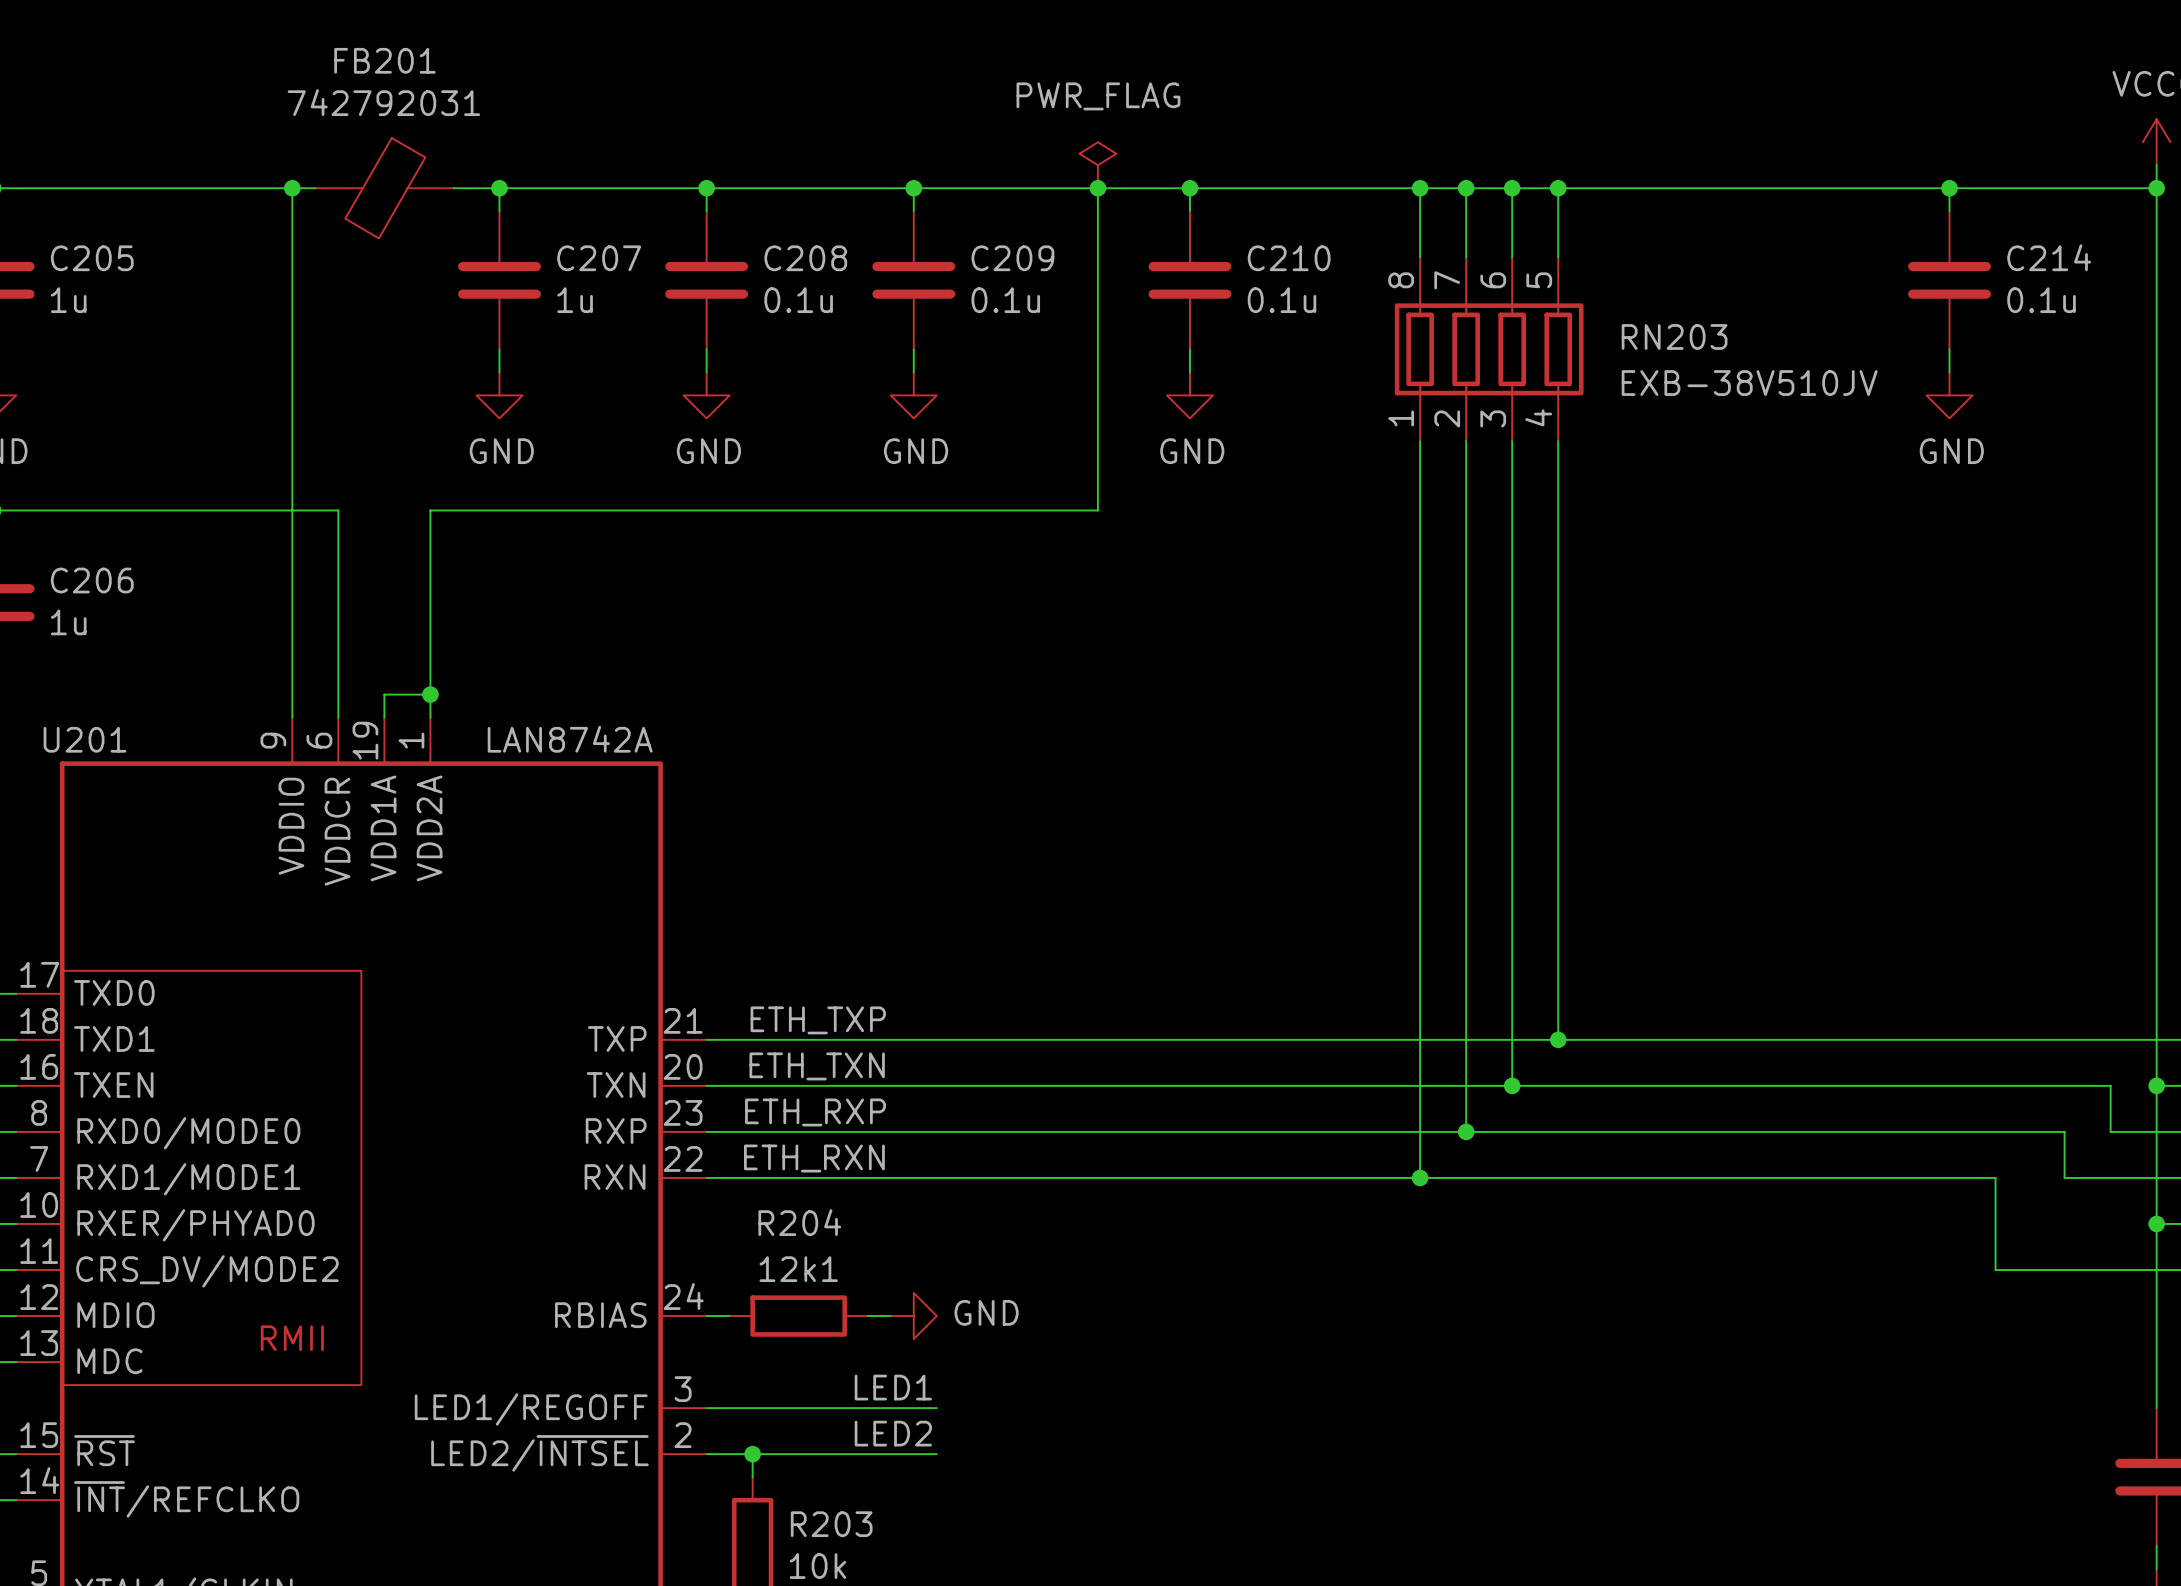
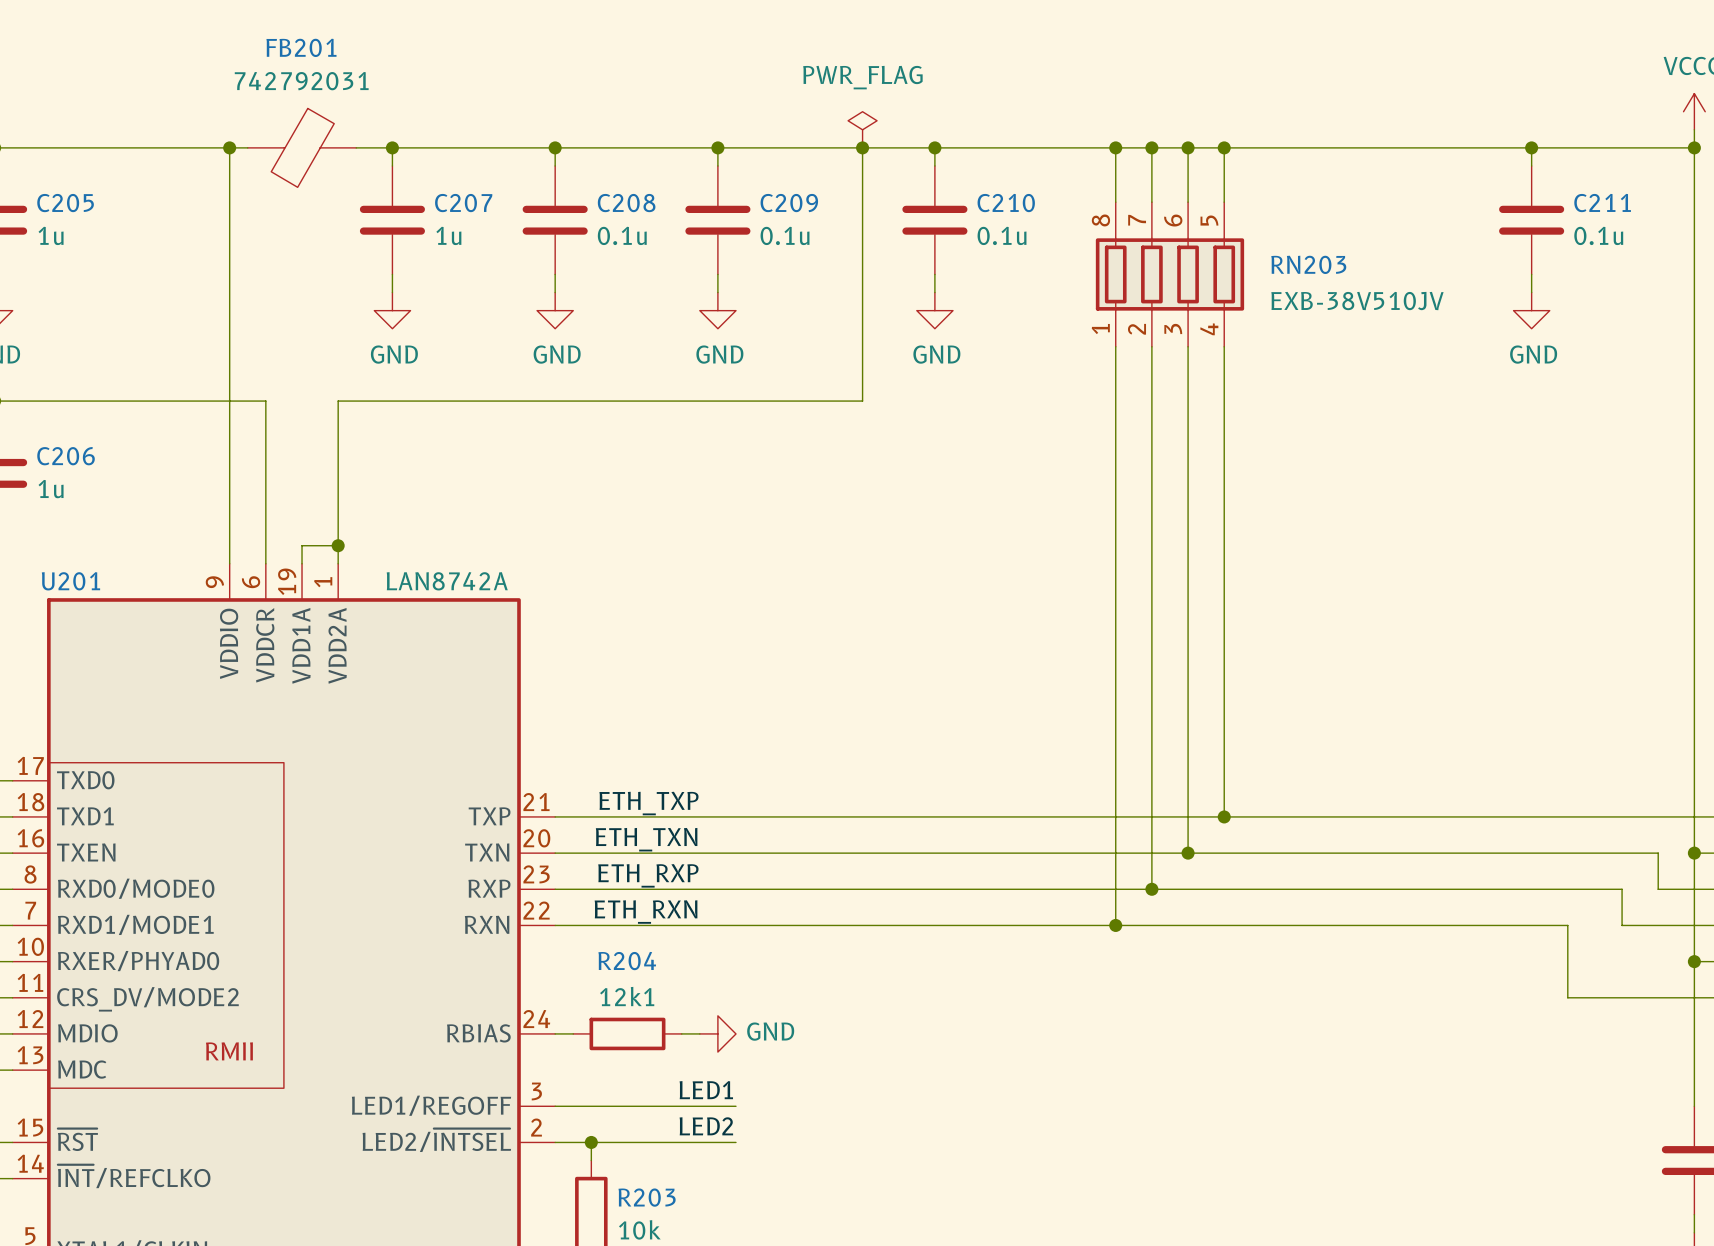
C214 name: C214 (2049, 257) -> C211 (1602, 203)

